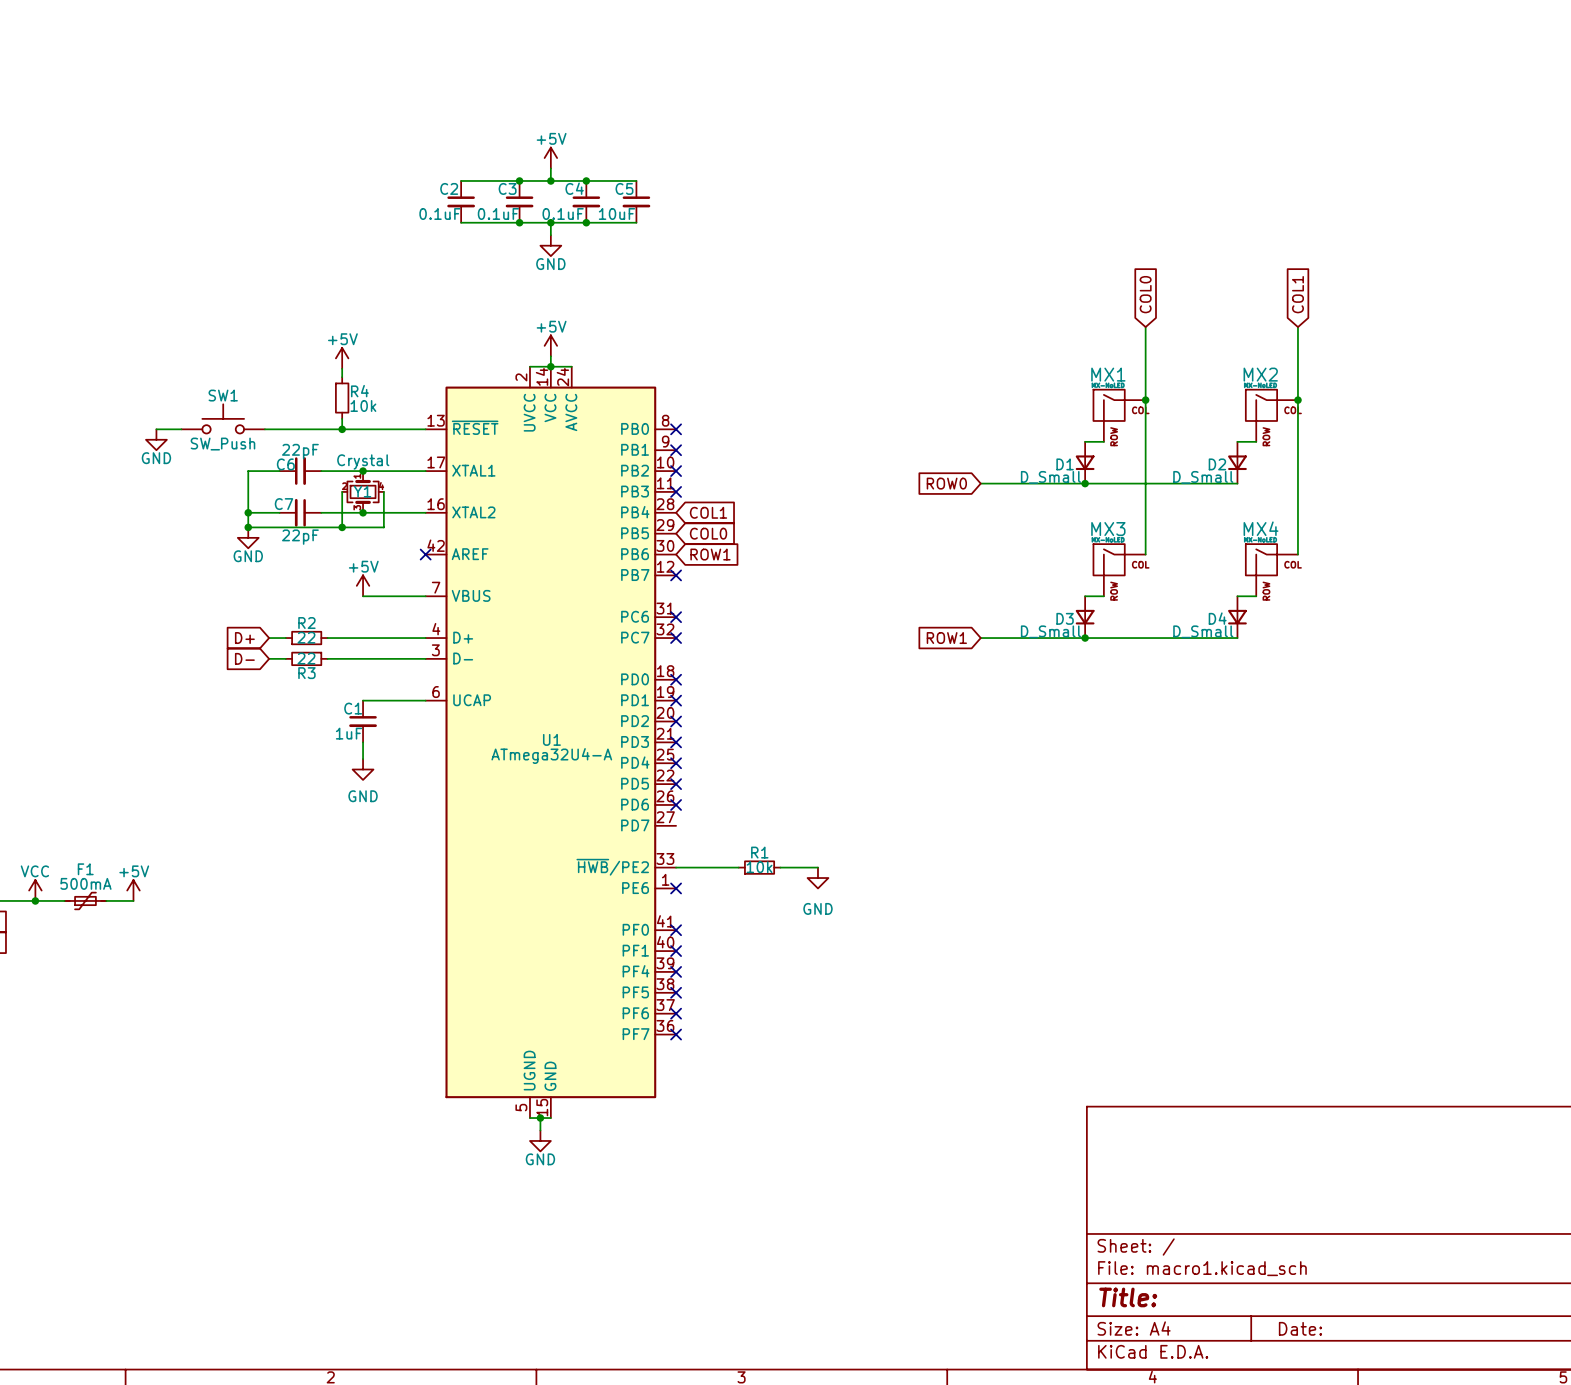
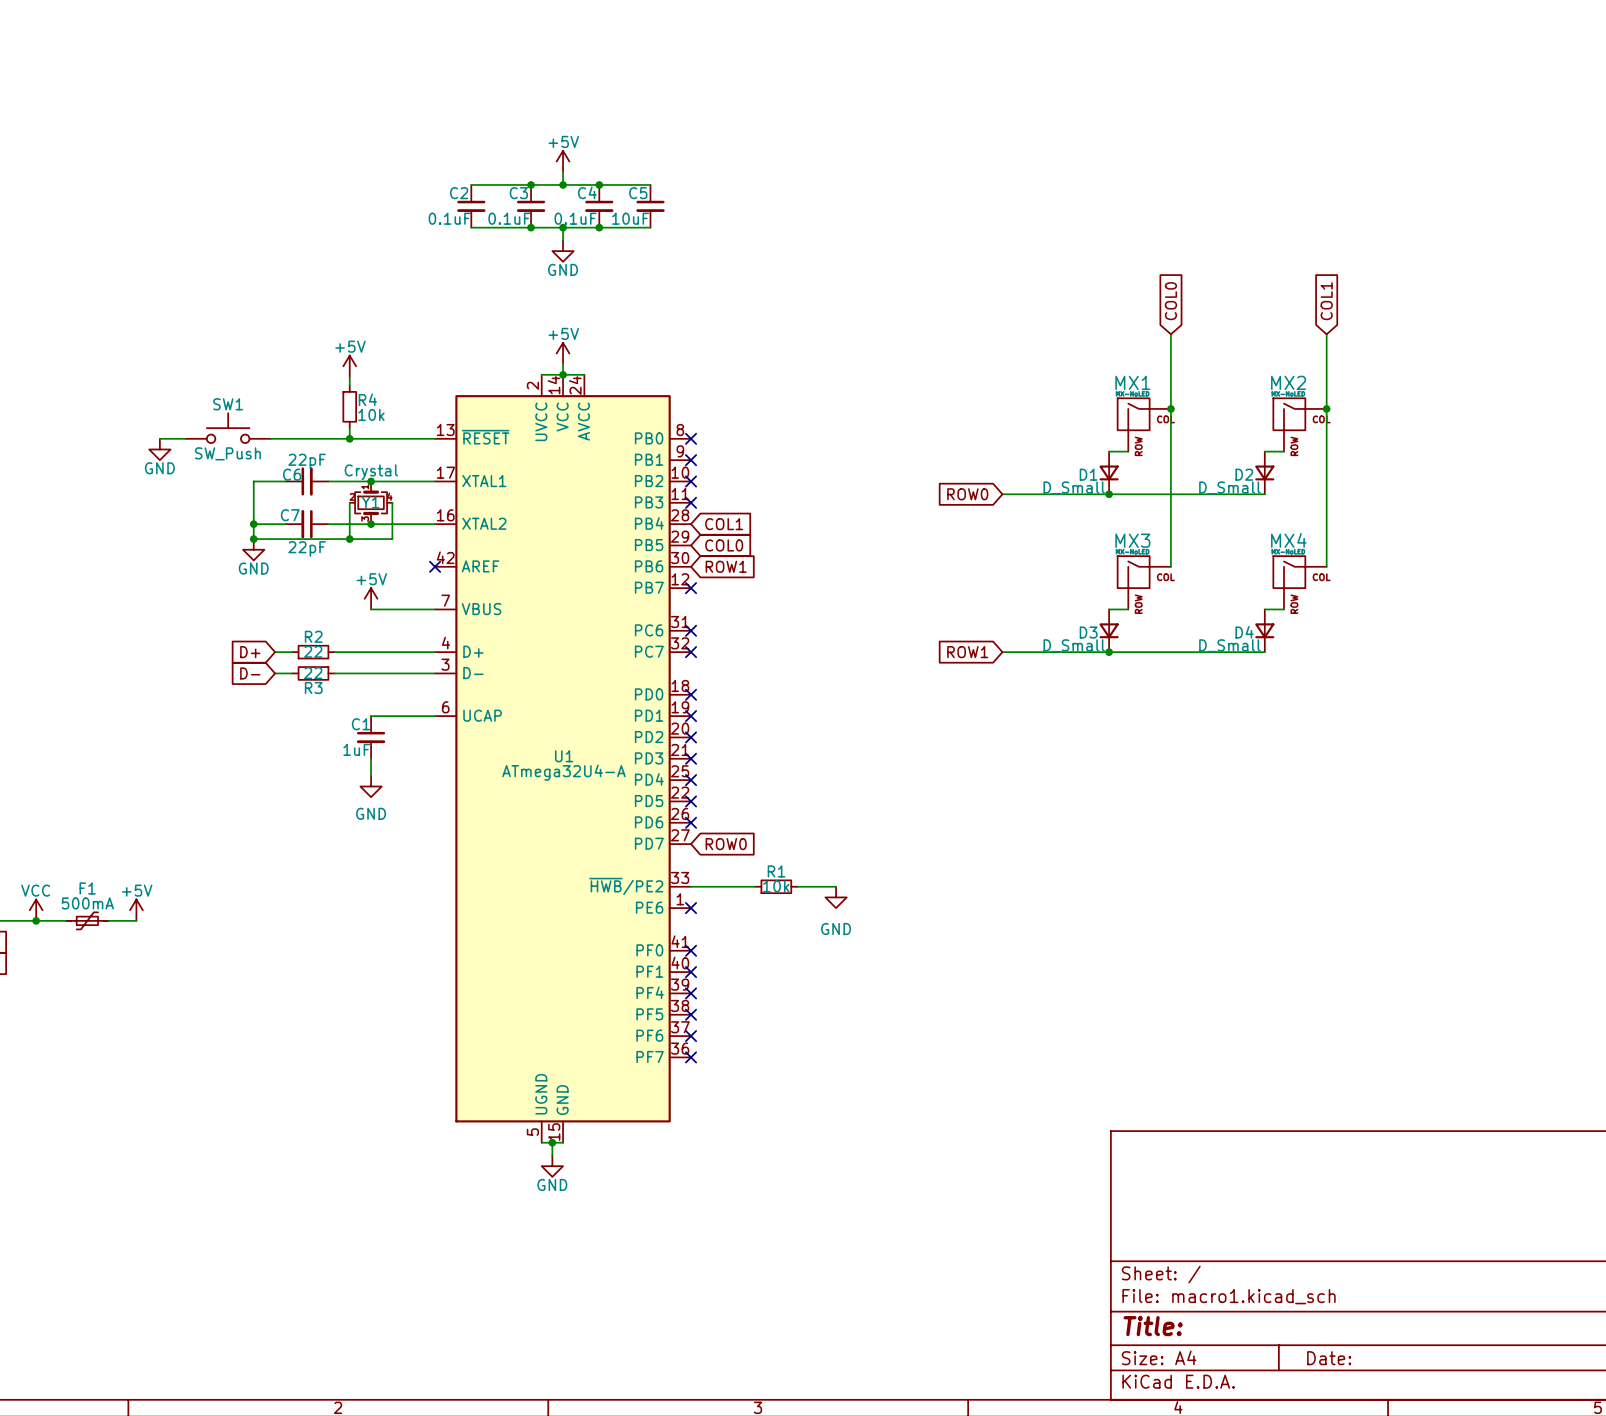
global label: none -> ROW0 (726, 844)

